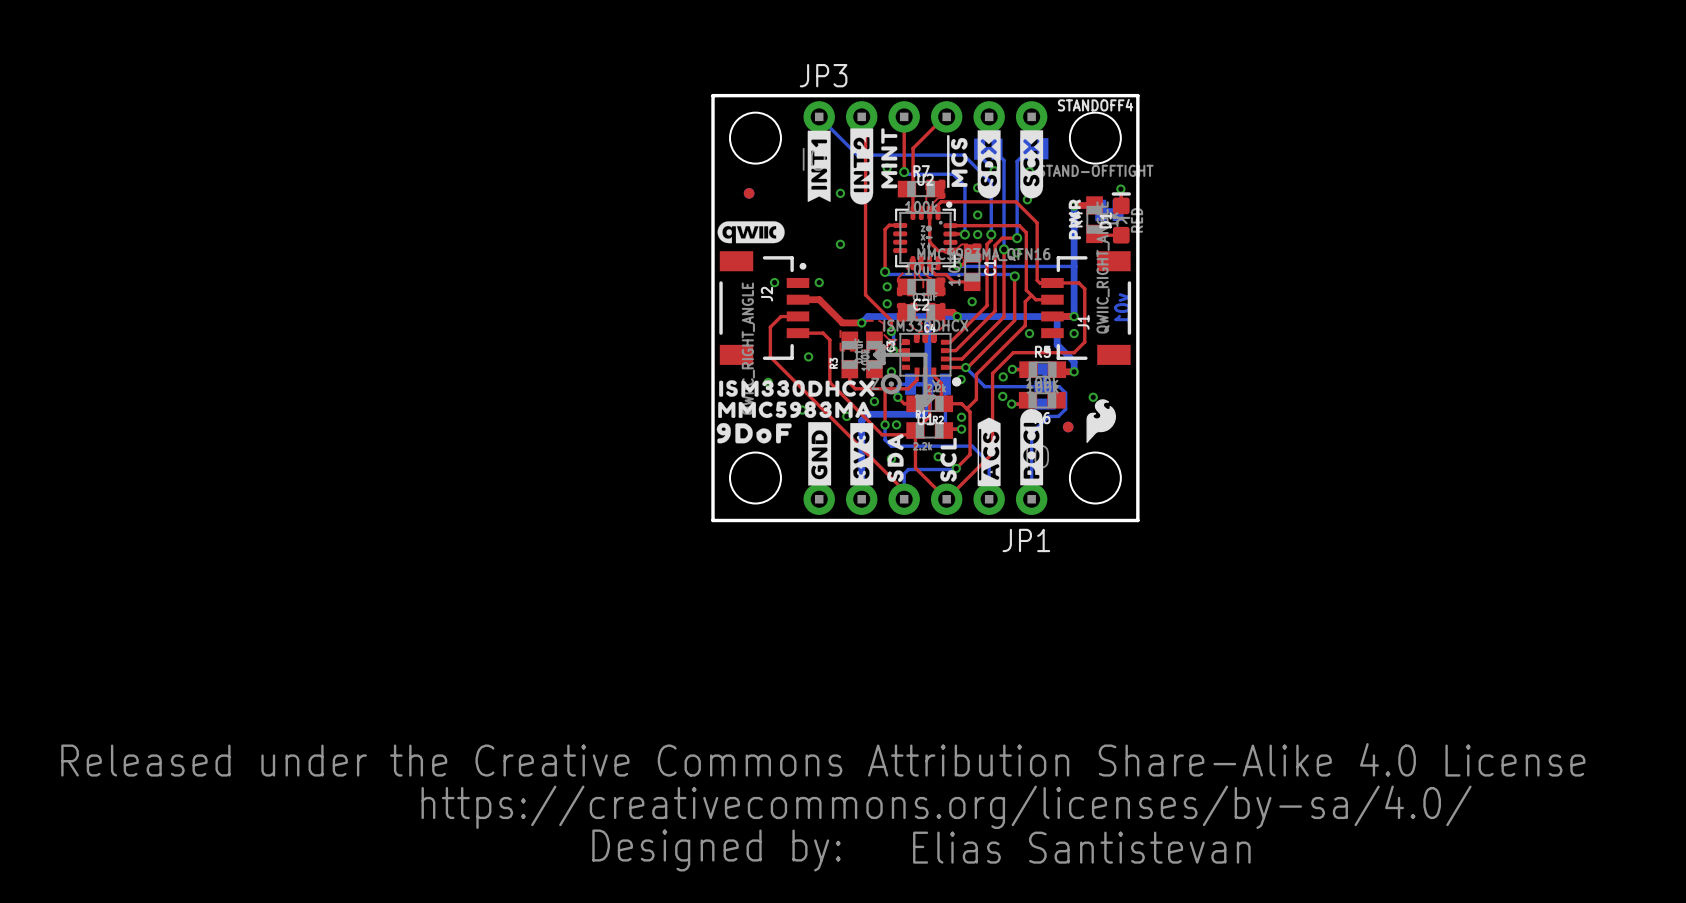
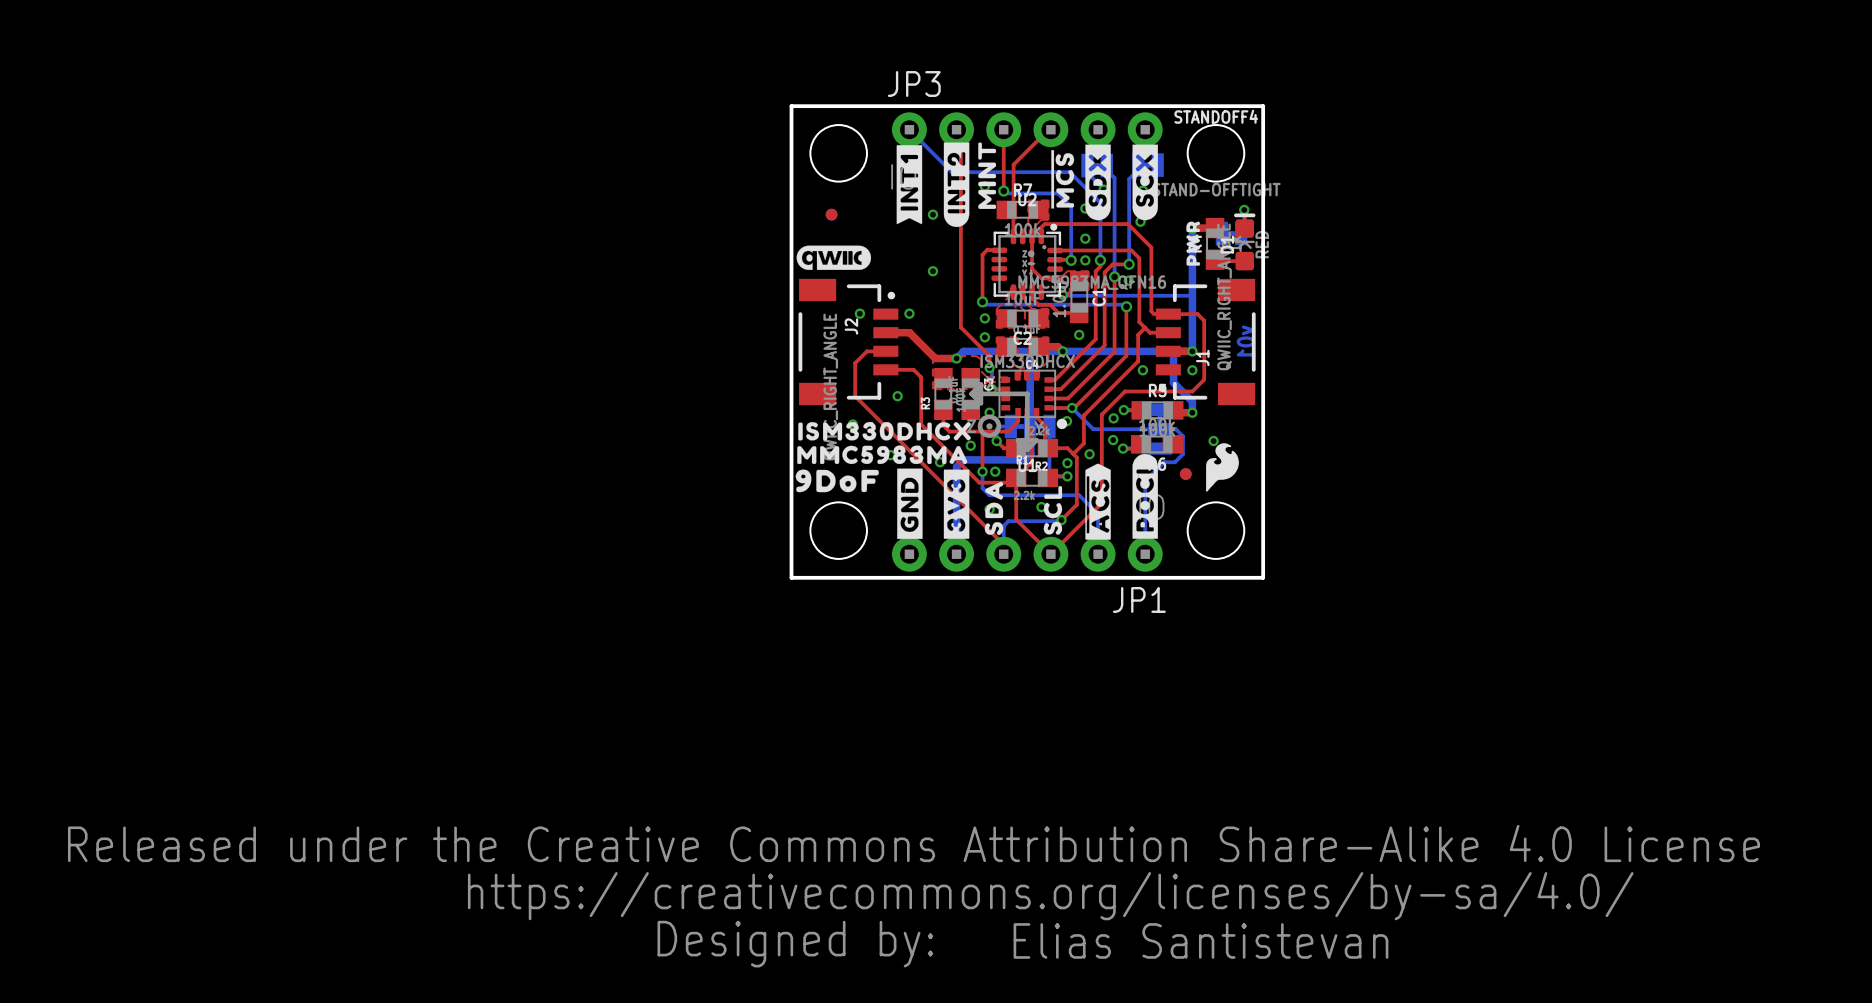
via: none -> (1089, 454)

